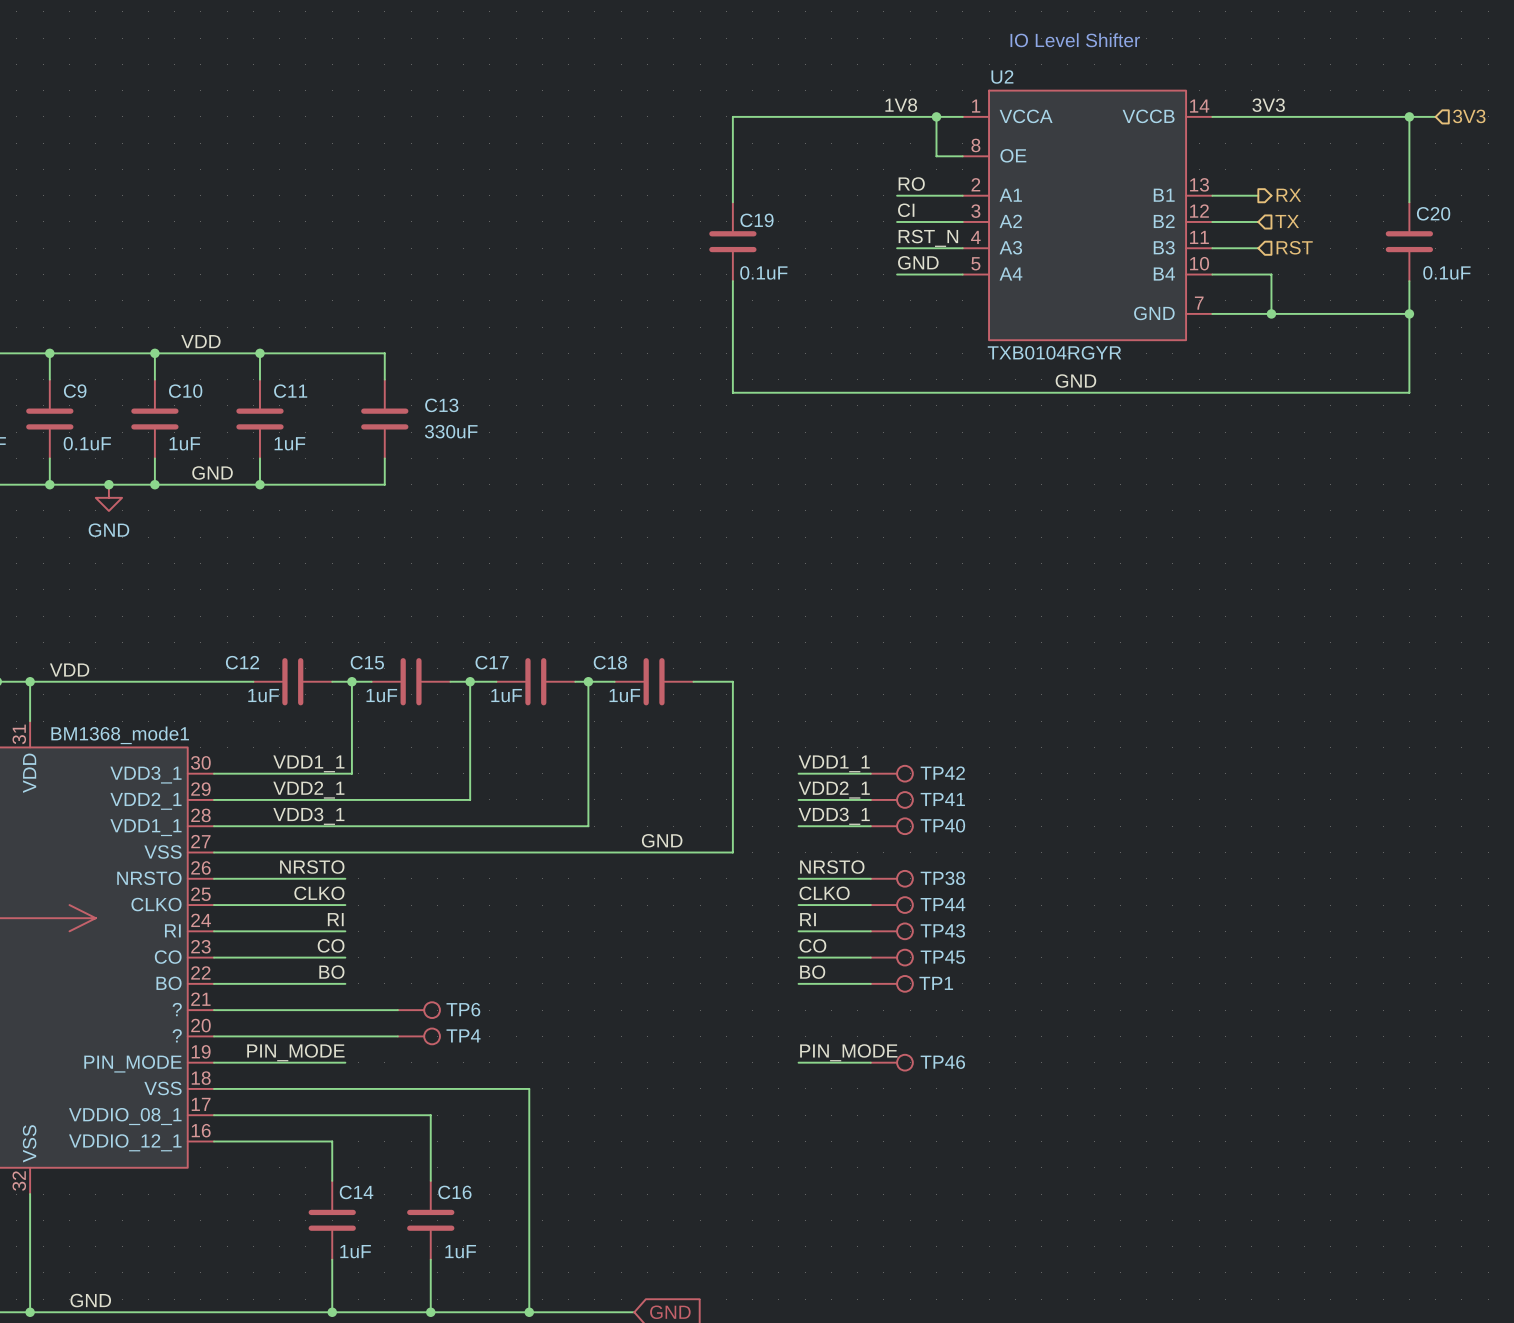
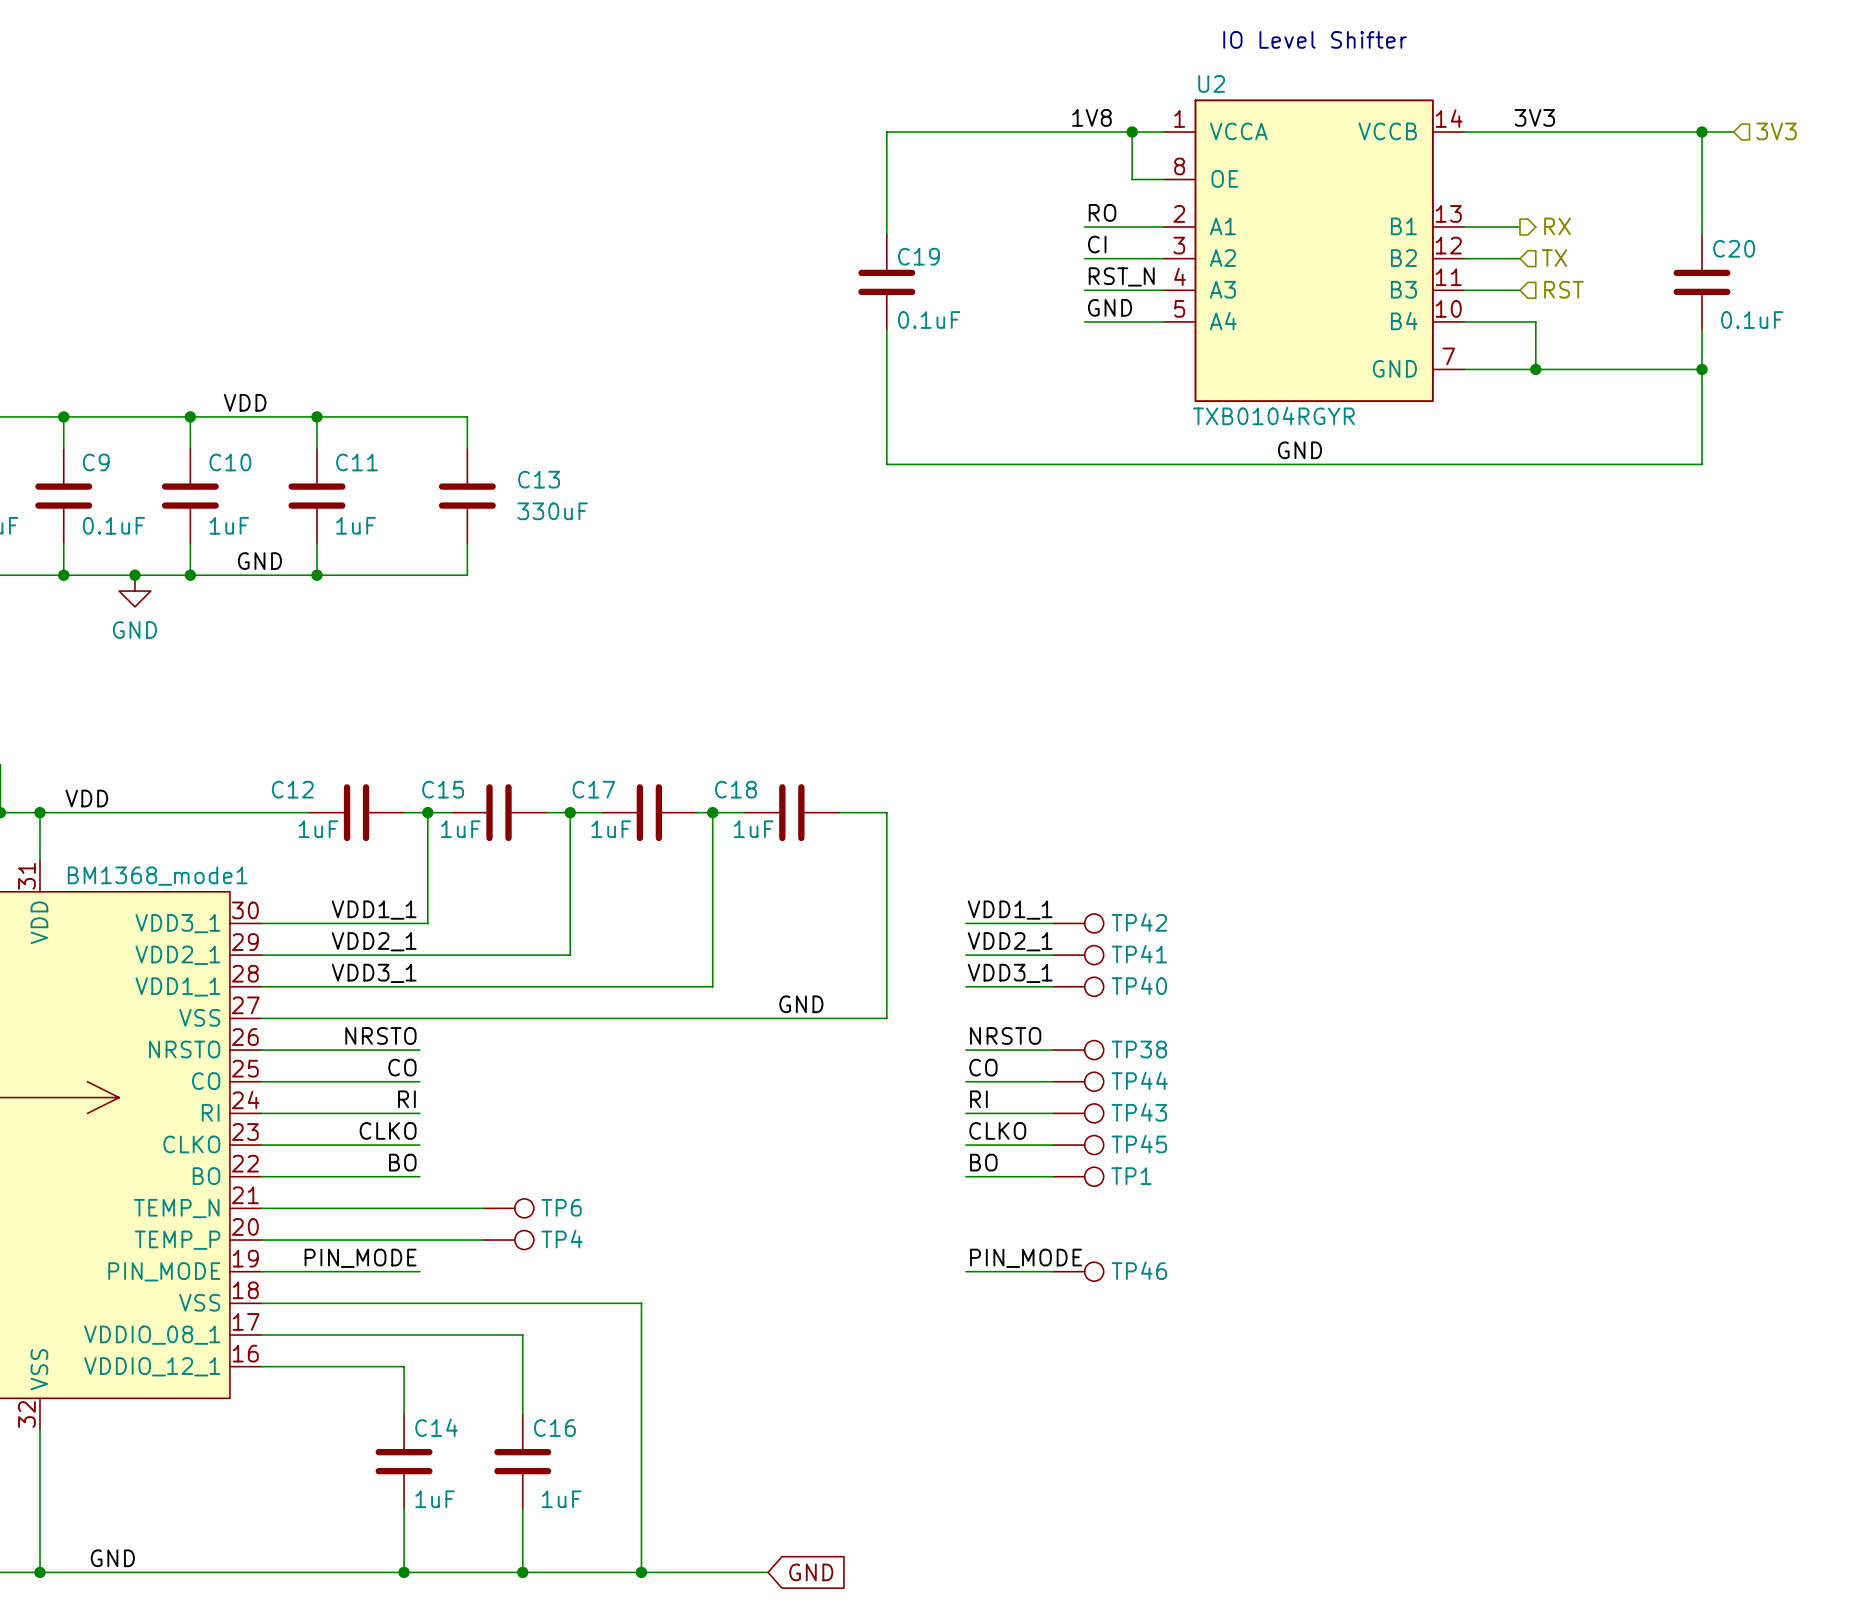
label: CLKO (319, 893) -> CO (402, 1067)
label: CLKO (824, 893) -> CO (983, 1067)
part pin name: CLKO (156, 904) -> CO (206, 1081)
label: CO (331, 945) -> CLKO (388, 1130)
label: CO (812, 945) -> CLKO (997, 1130)
part pin name: CO (168, 957) -> CLKO (191, 1144)
part pin name: ? (177, 1009) -> TEMP_N (176, 1208)
part pin name: ? (177, 1035) -> TEMP_P (177, 1240)

